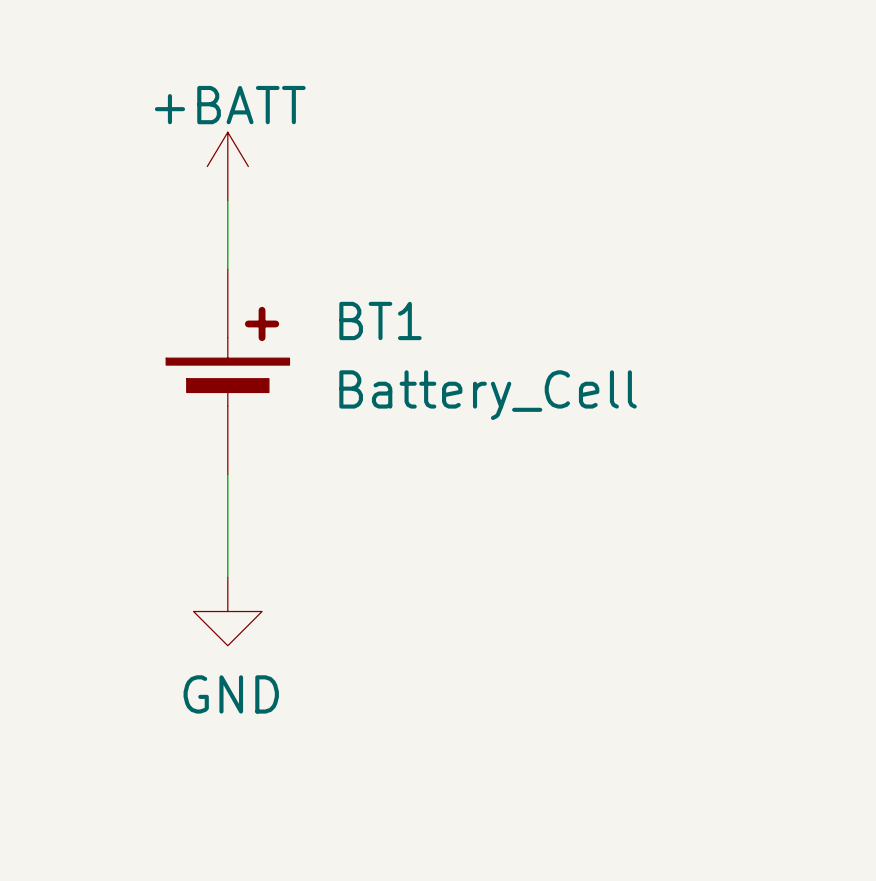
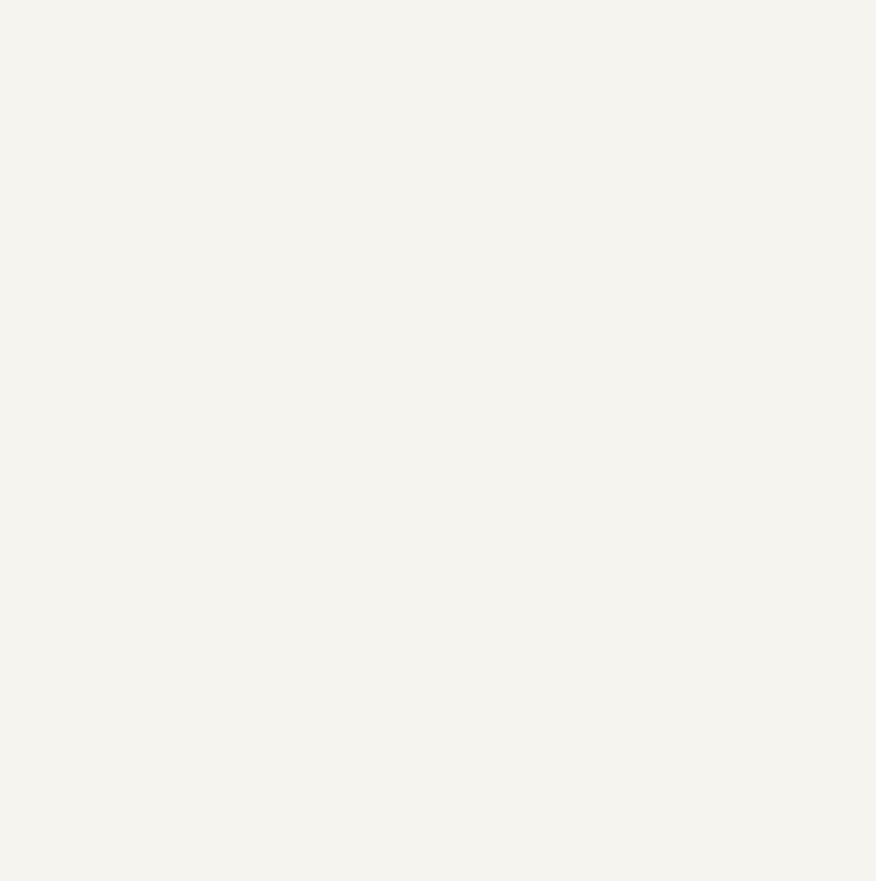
power symbol: +BATT (227, 166) -> none
wire: (227, 200) (227, 269) -> none
BT1: Battery_Cell (227, 371) -> none
wire: (227, 474) (227, 577) -> none
power symbol: GND (227, 611) -> none

